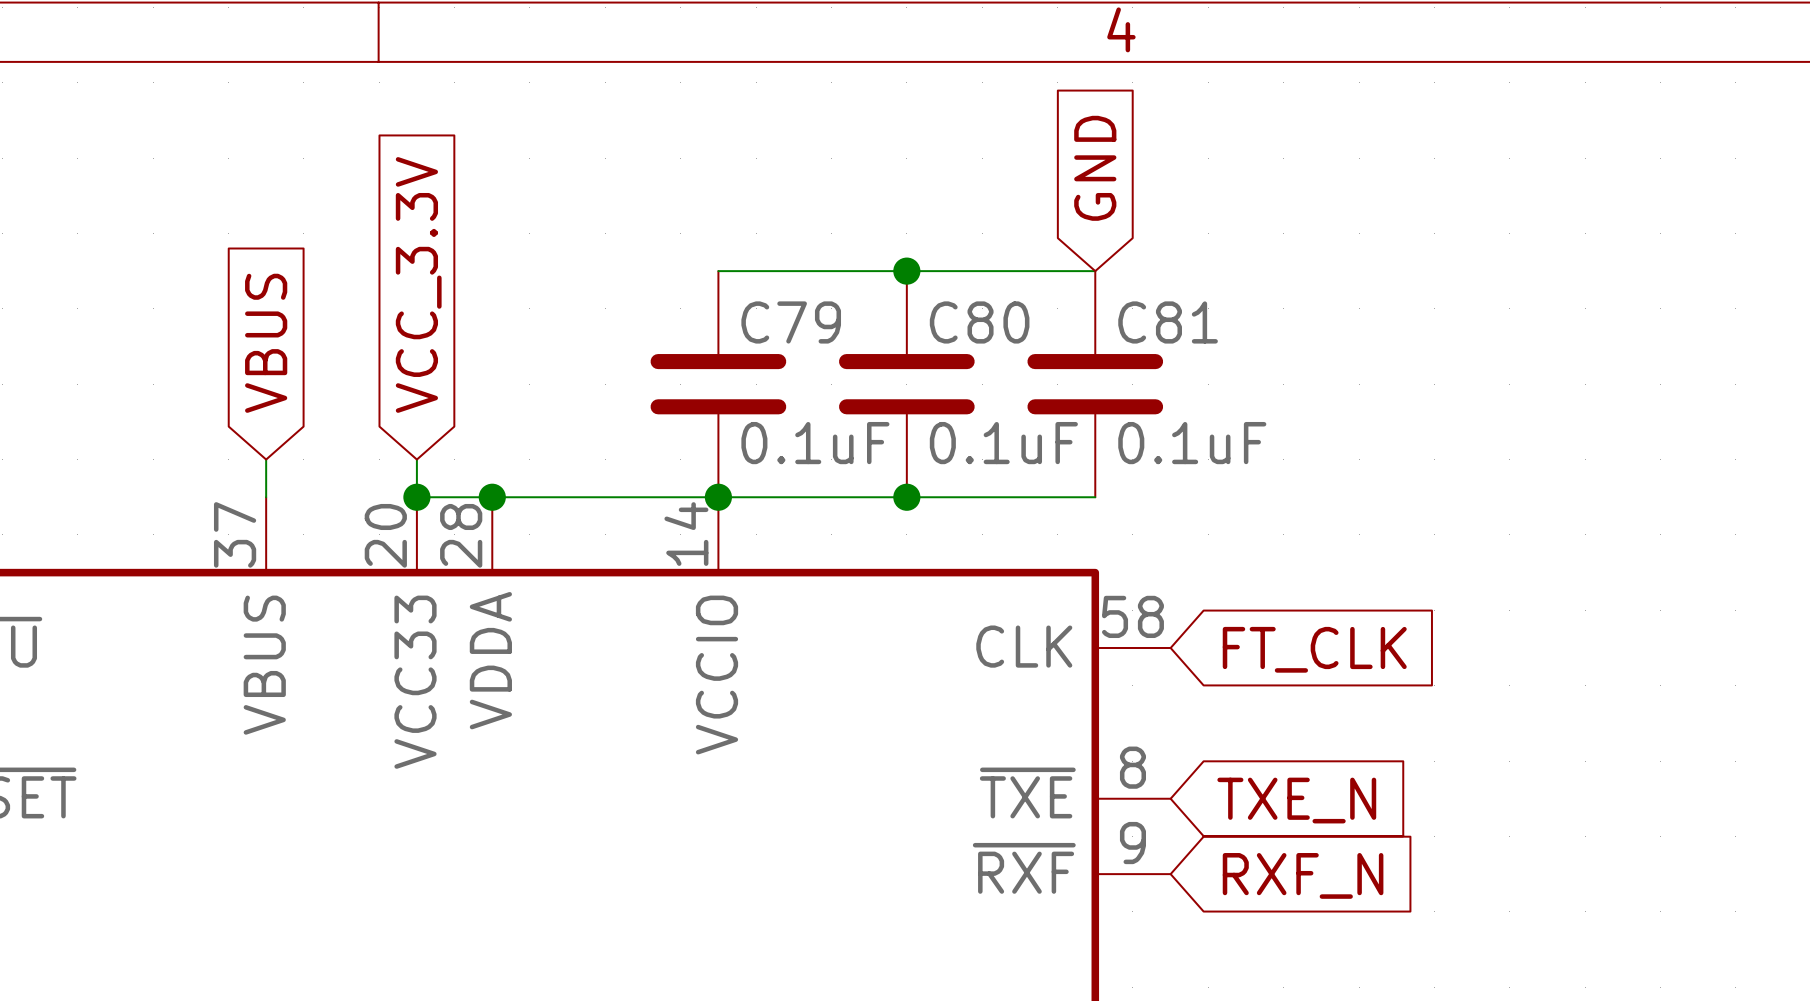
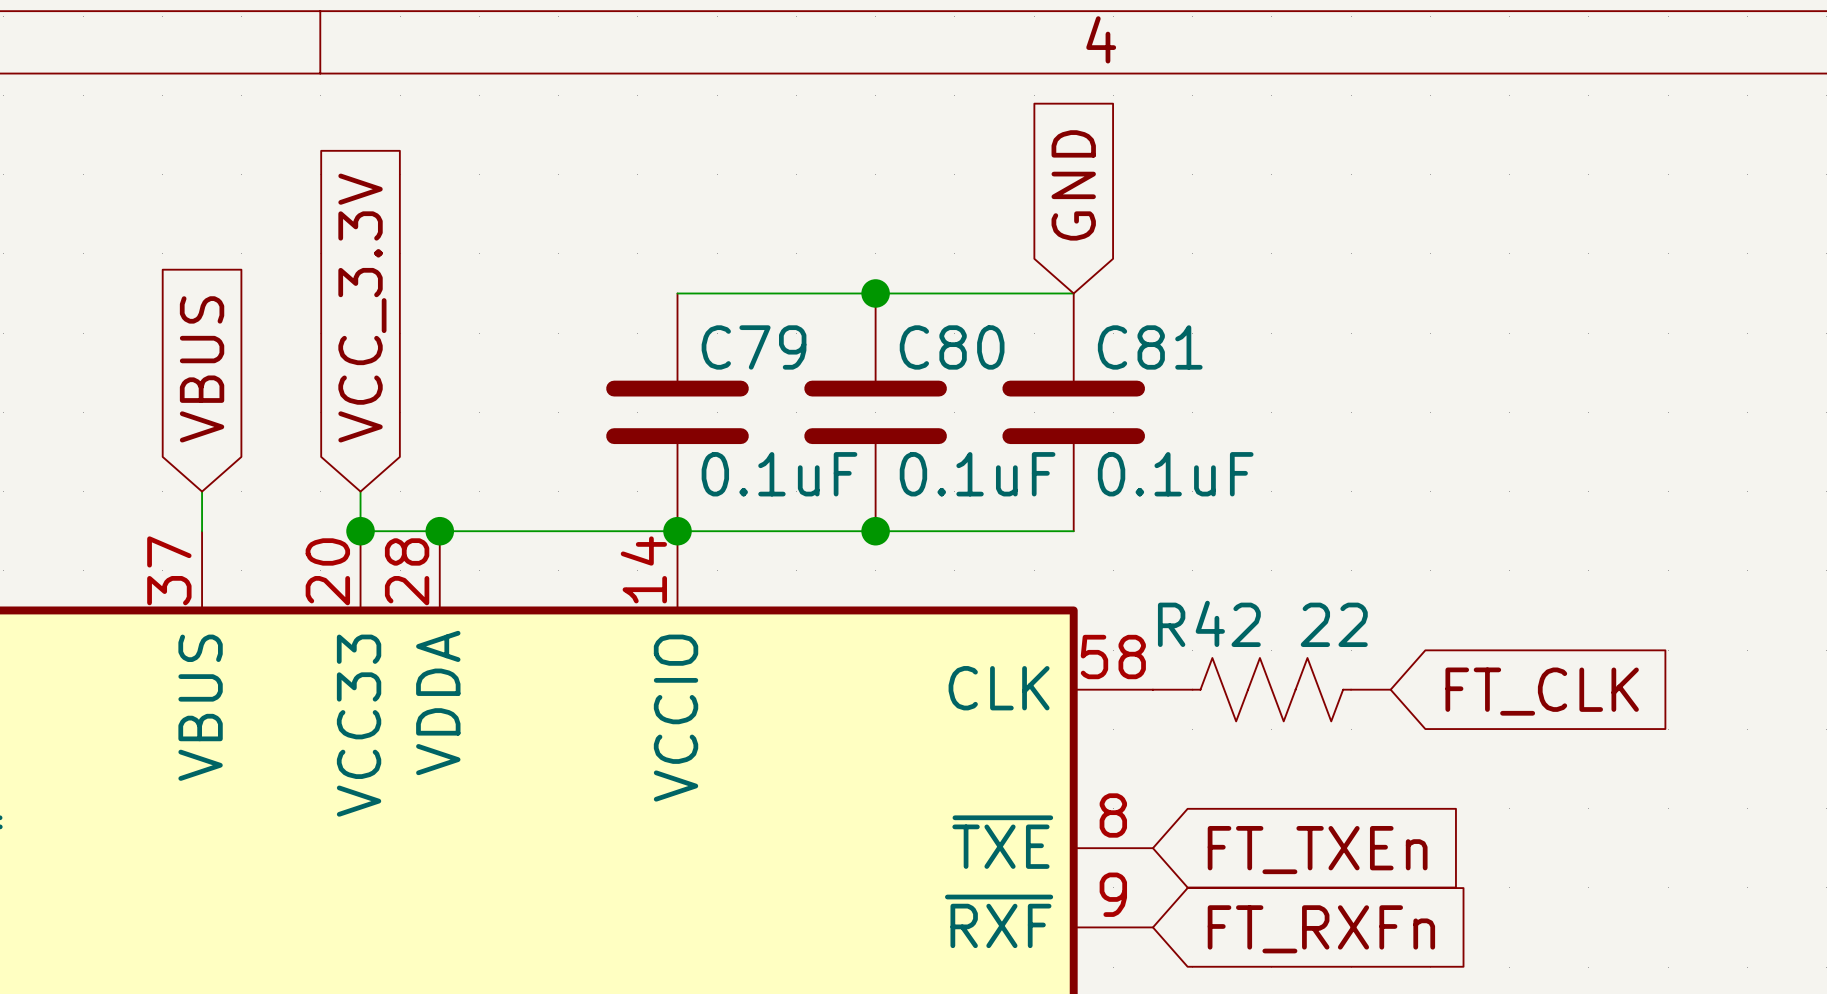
R42: none -> 22 (1271, 689)
global label position: FT_CLK (1314, 649) -> FT_CLK (1542, 691)
global label: TXE_N (1296, 800) -> FT_TXEn (1317, 850)
global label: RXF_N (1303, 875) -> FT_RXFn (1321, 929)

